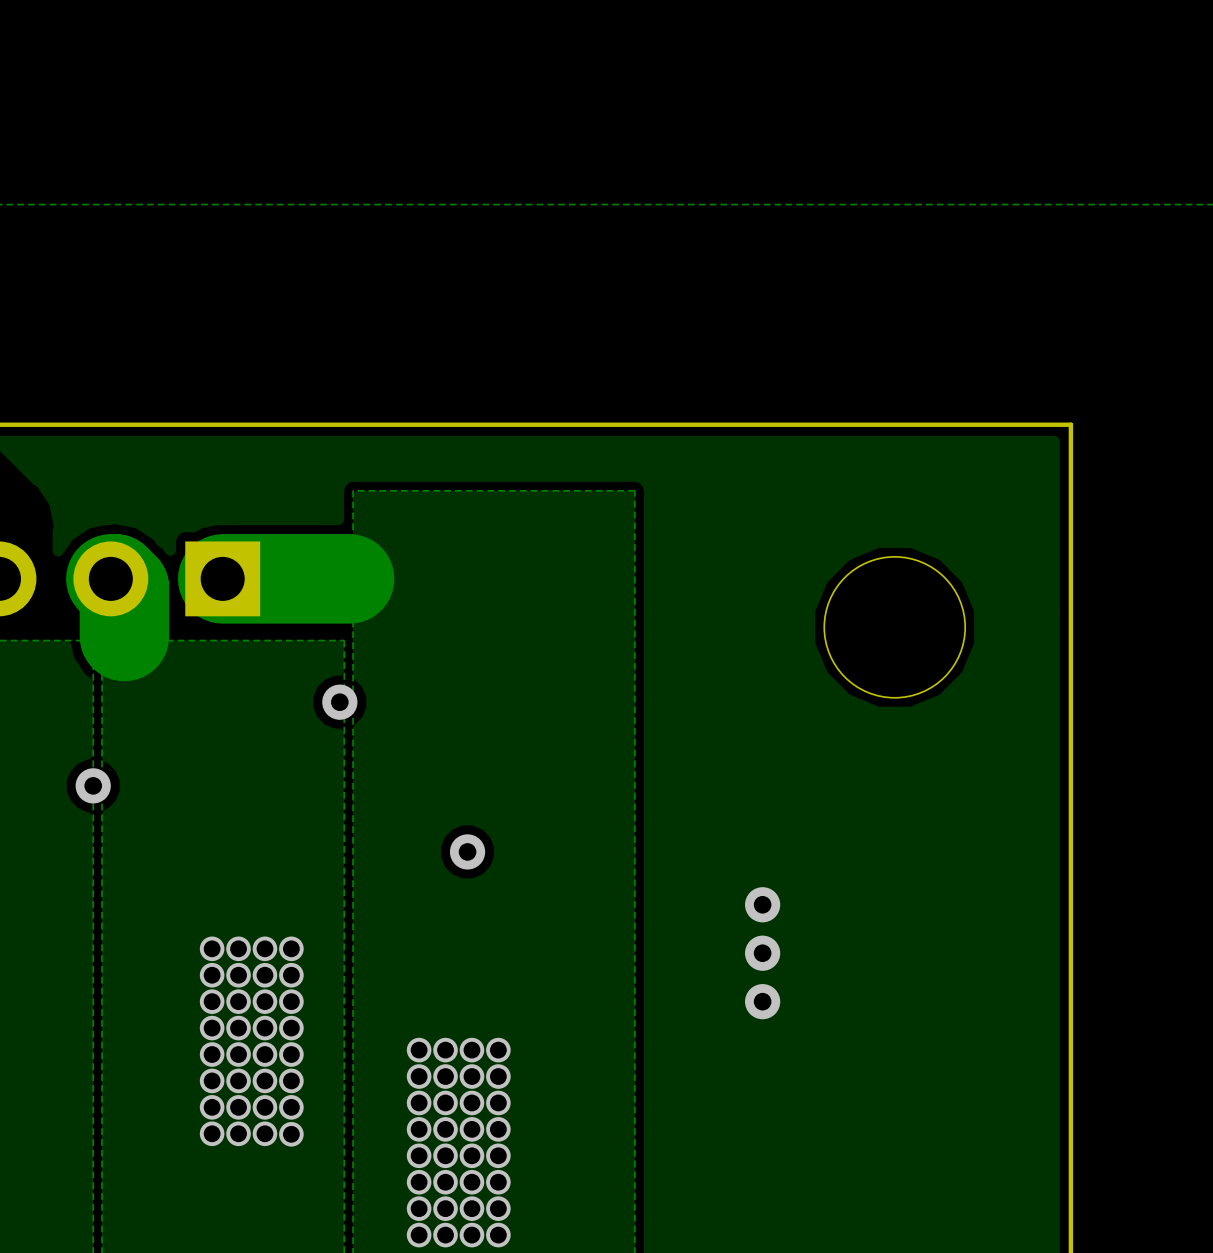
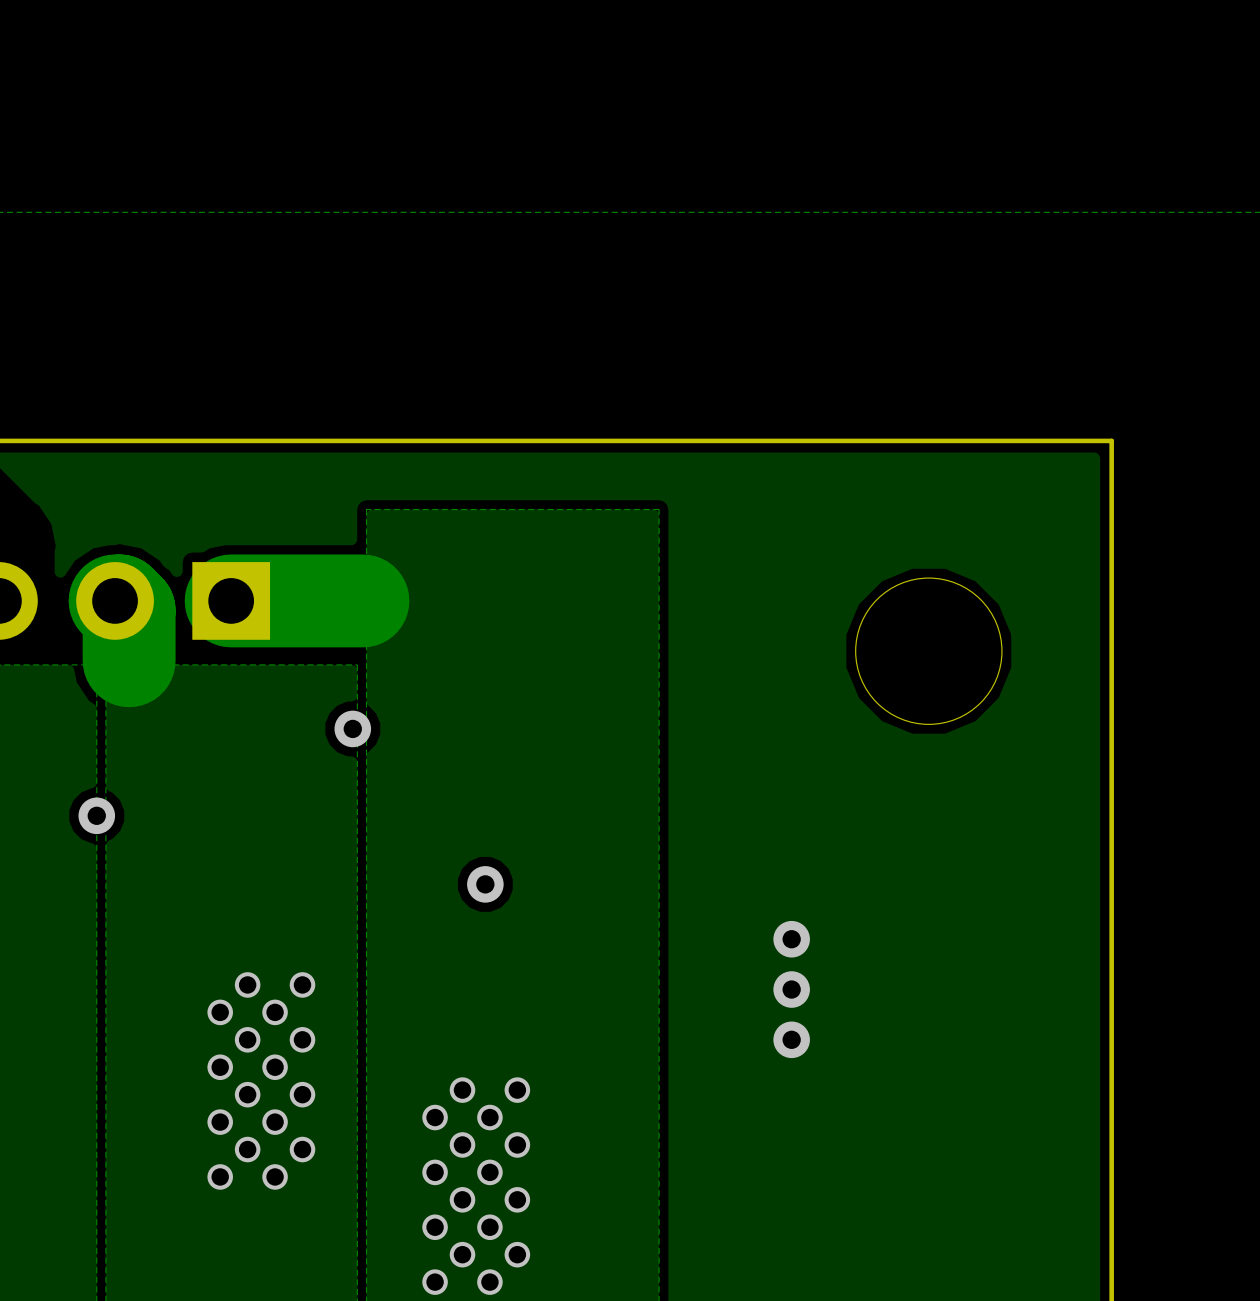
via: (212, 948) -> none
via: (264, 948) -> none
via: (238, 975) -> none
via: (291, 975) -> none
via: (212, 1001) -> none
via: (264, 1001) -> none
via: (238, 1028) -> none
via: (291, 1028) -> none
via: (419, 1050) -> none
via: (471, 1050) -> none
via: (212, 1054) -> none
via: (264, 1054) -> none
via: (445, 1076) -> none
via: (498, 1076) -> none
via: (238, 1080) -> none
via: (291, 1080) -> none
via: (419, 1102) -> none
via: (471, 1102) -> none
via: (212, 1107) -> none
via: (264, 1107) -> none
via: (445, 1129) -> none
via: (498, 1129) -> none
via: (238, 1133) -> none
via: (291, 1134) -> none
via: (419, 1155) -> none
via: (471, 1155) -> none
via: (445, 1182) -> none
via: (498, 1182) -> none
via: (419, 1208) -> none
via: (471, 1208) -> none
via: (445, 1235) -> none
via: (498, 1235) -> none

